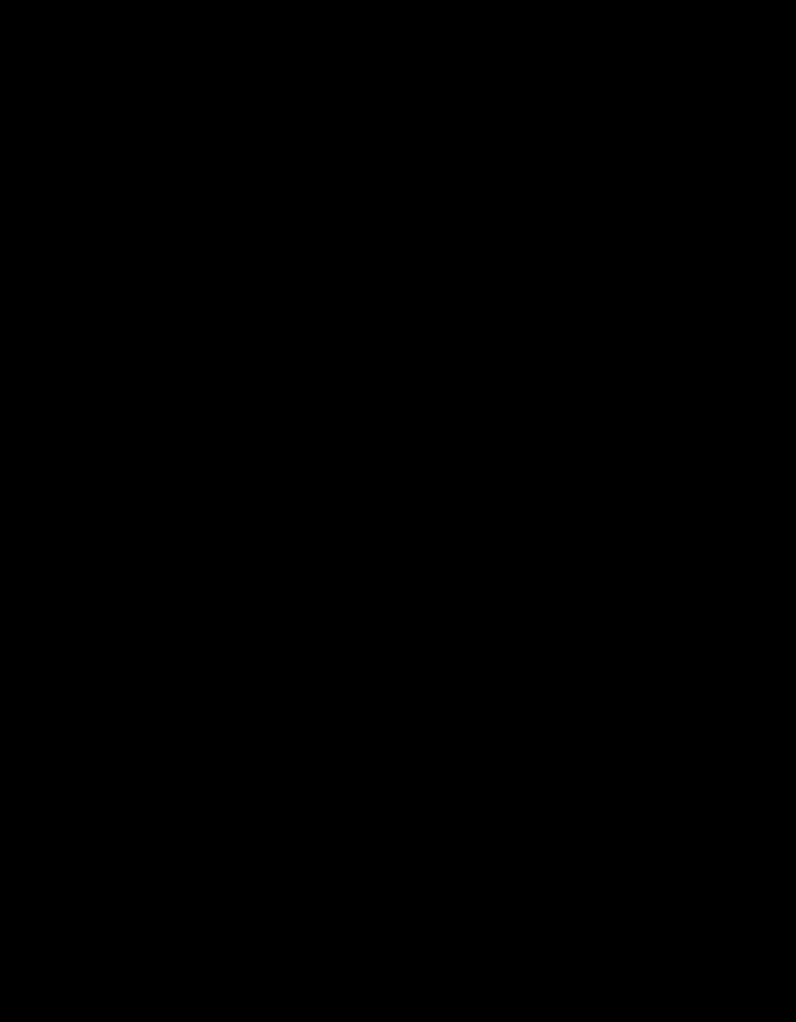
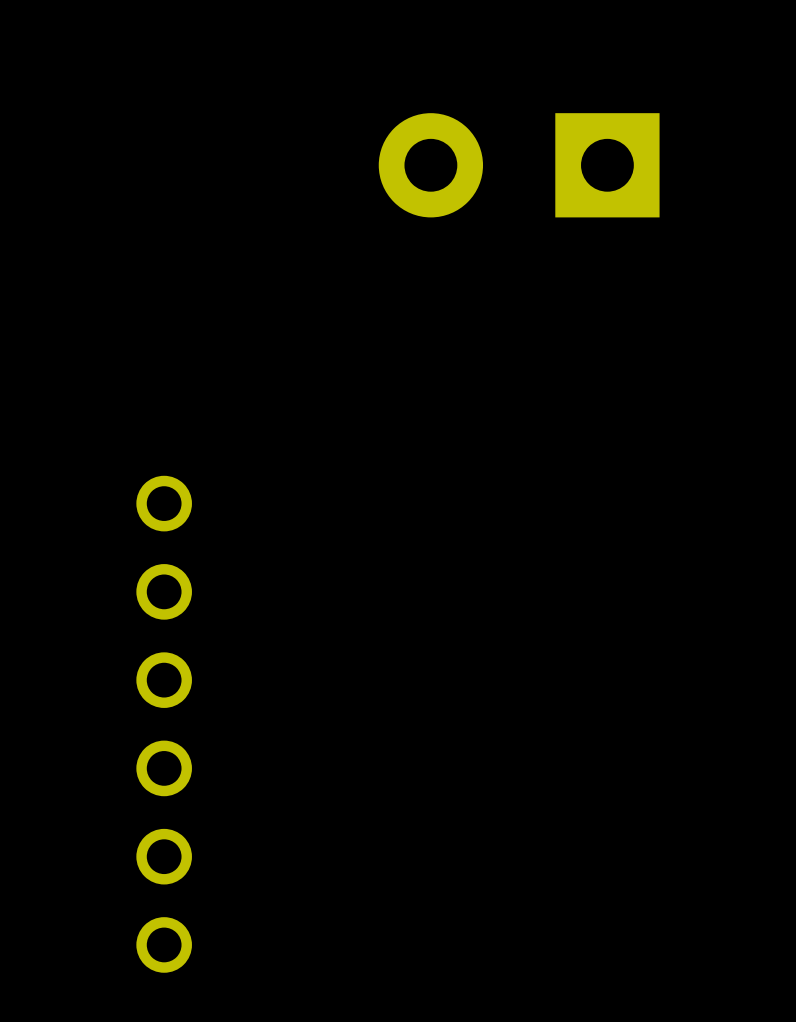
part: none -> (519, 165)
part: none -> (164, 724)

